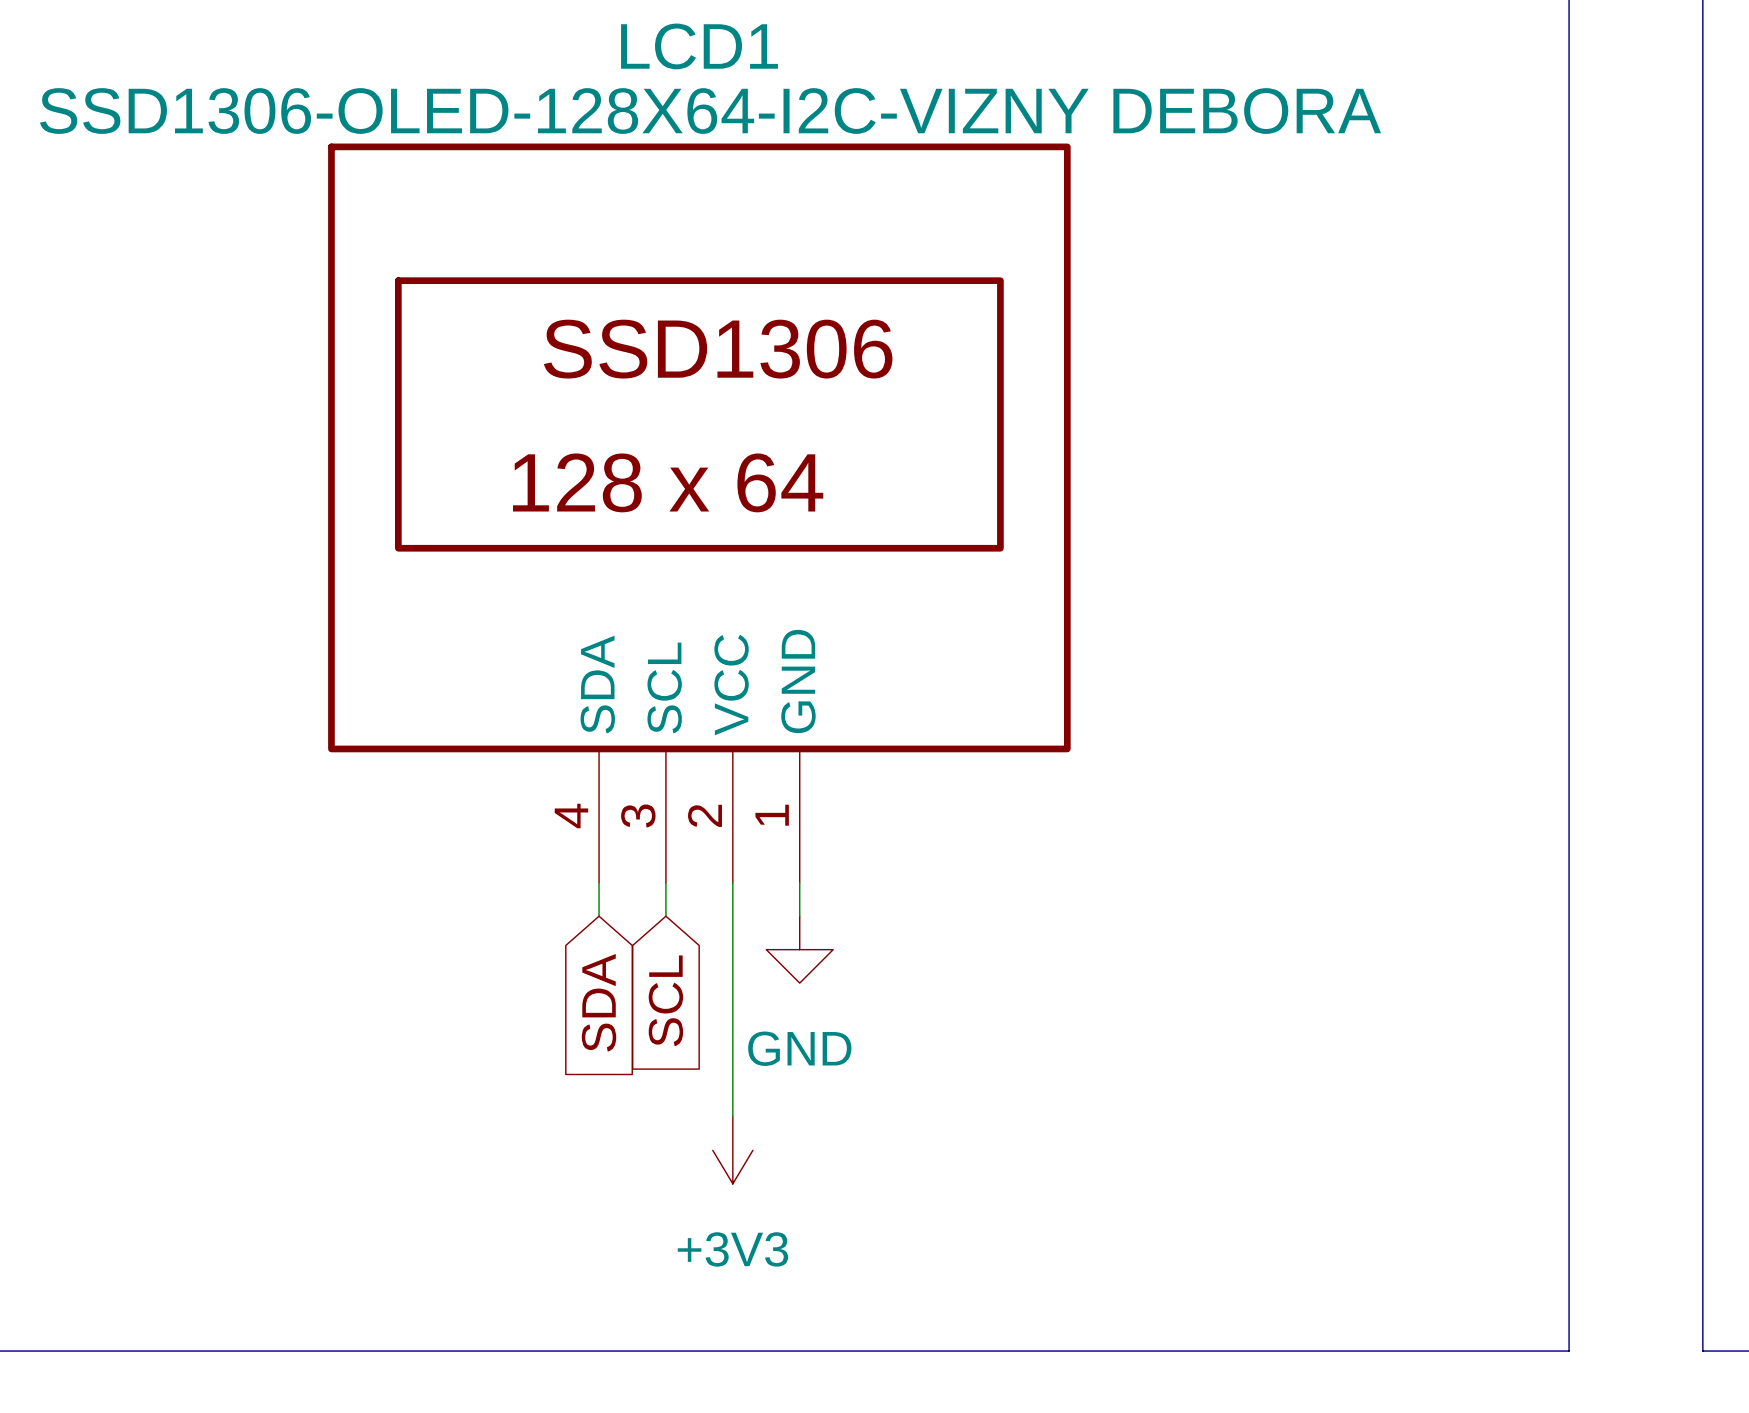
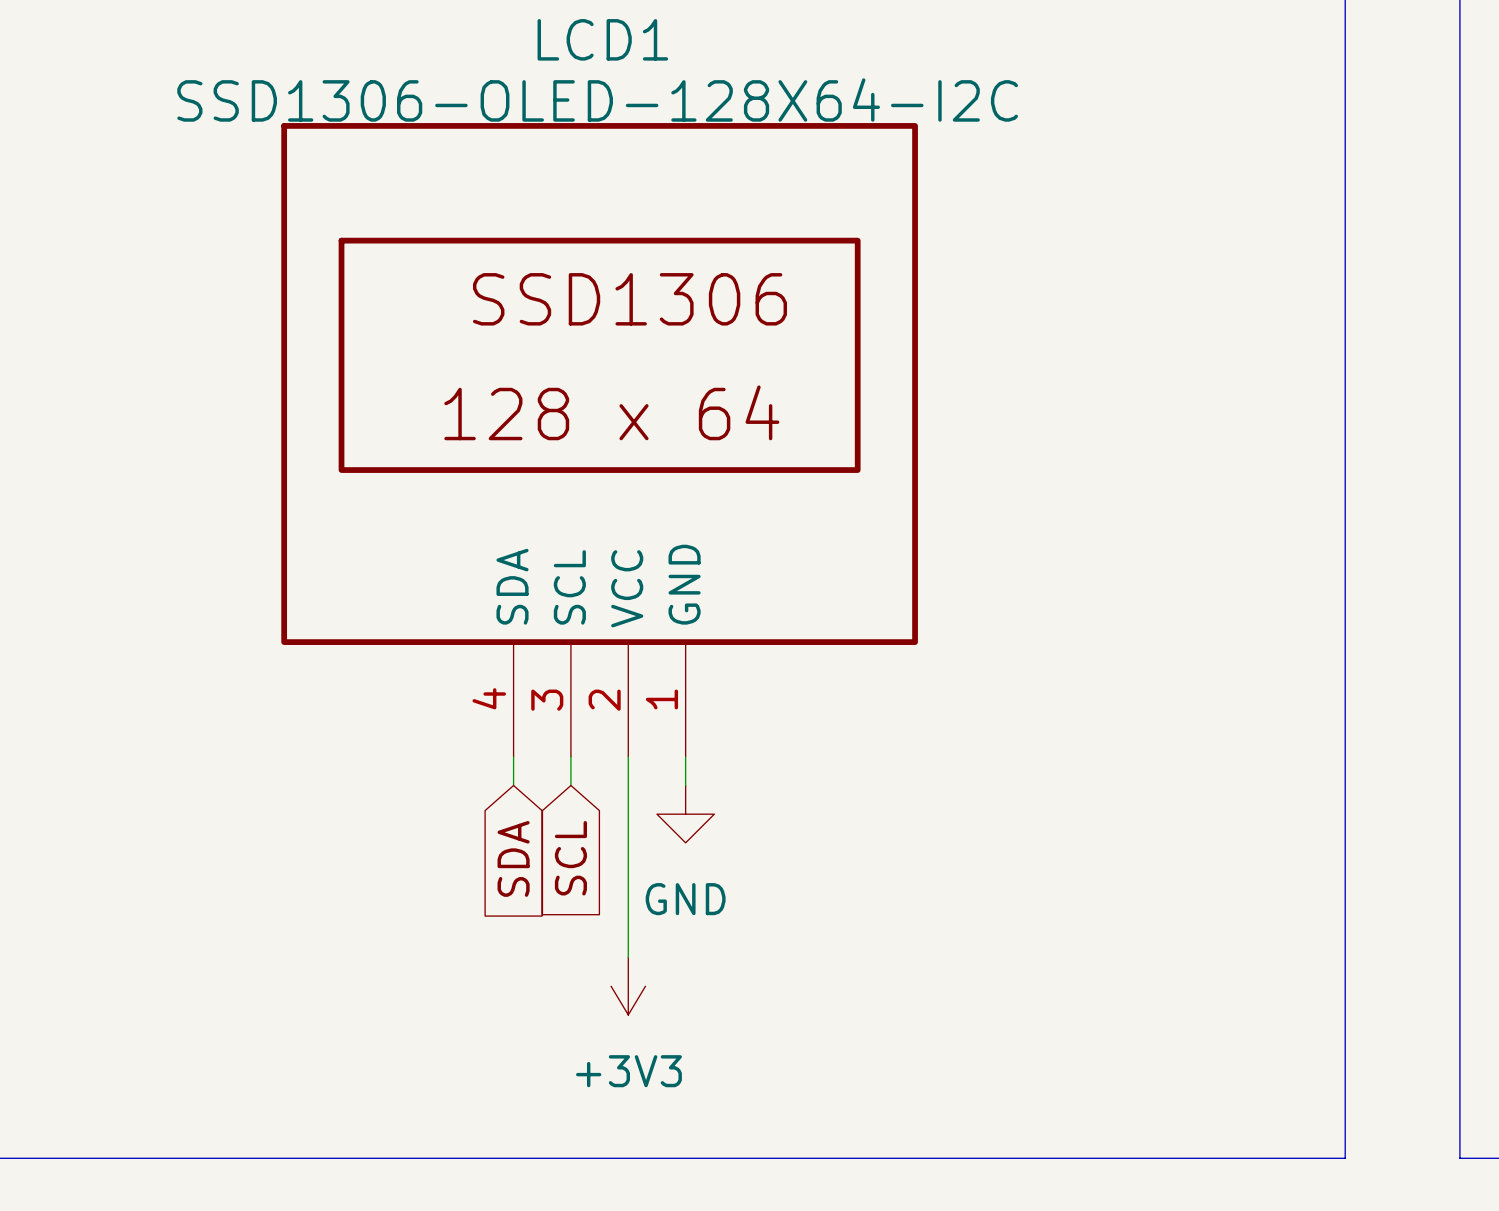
LCD1 value: SSD1306-OLED-128X64-I2C-VIZNY DEBORA (710, 111) -> SSD1306-OLED-128X64-I2C (597, 100)

